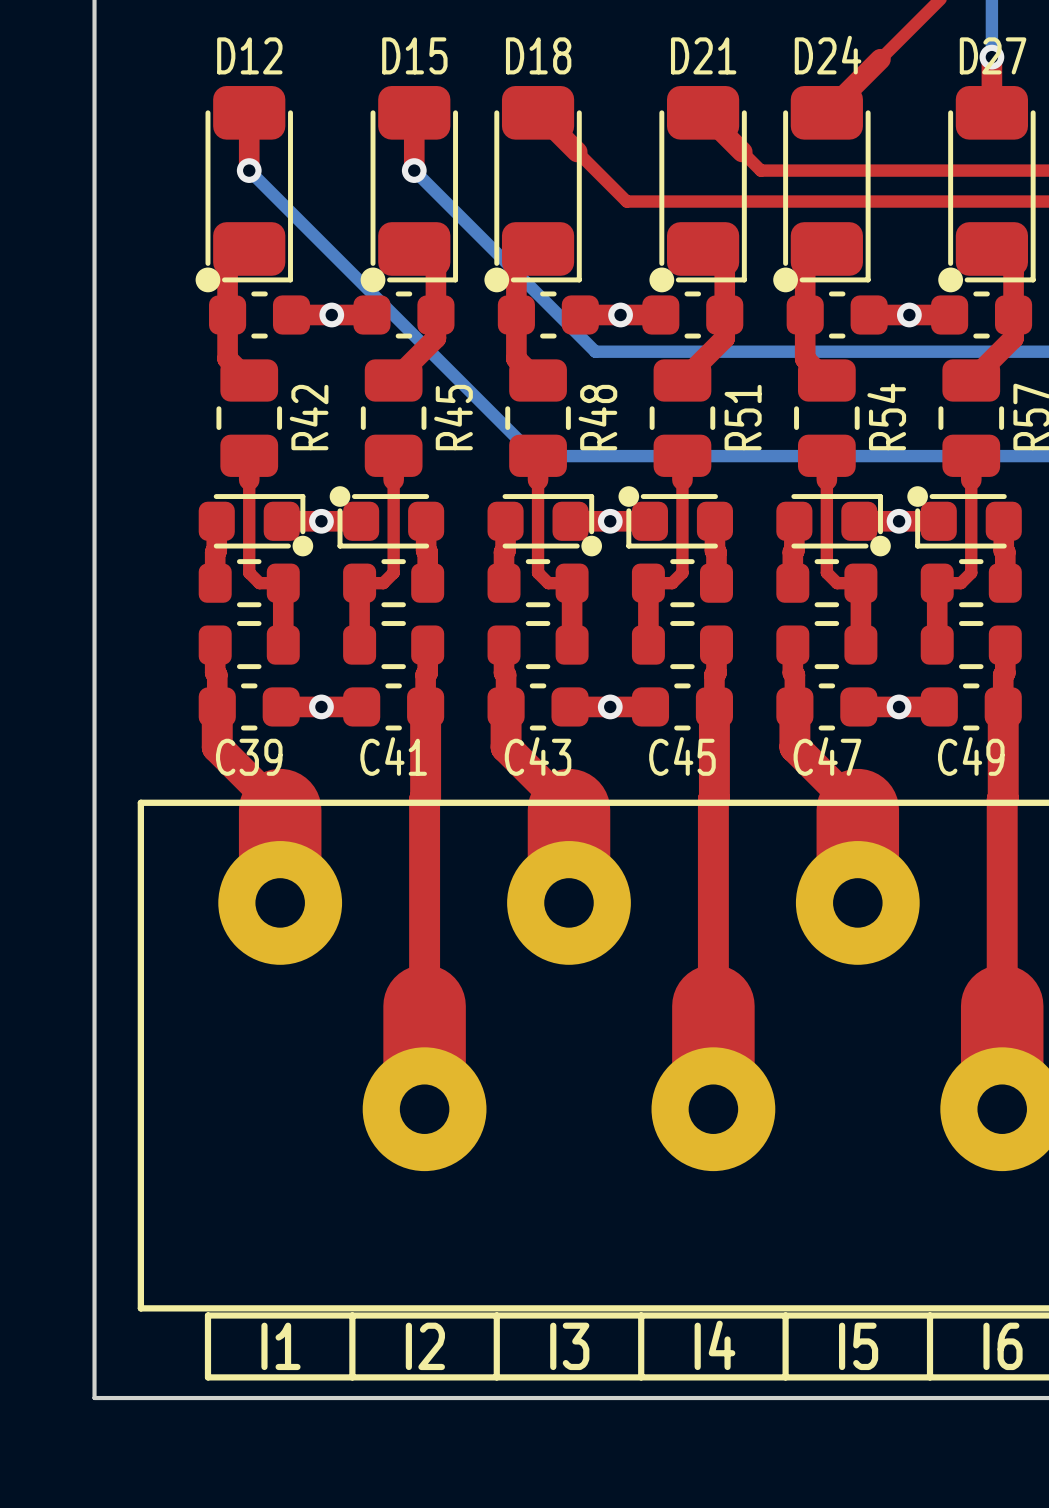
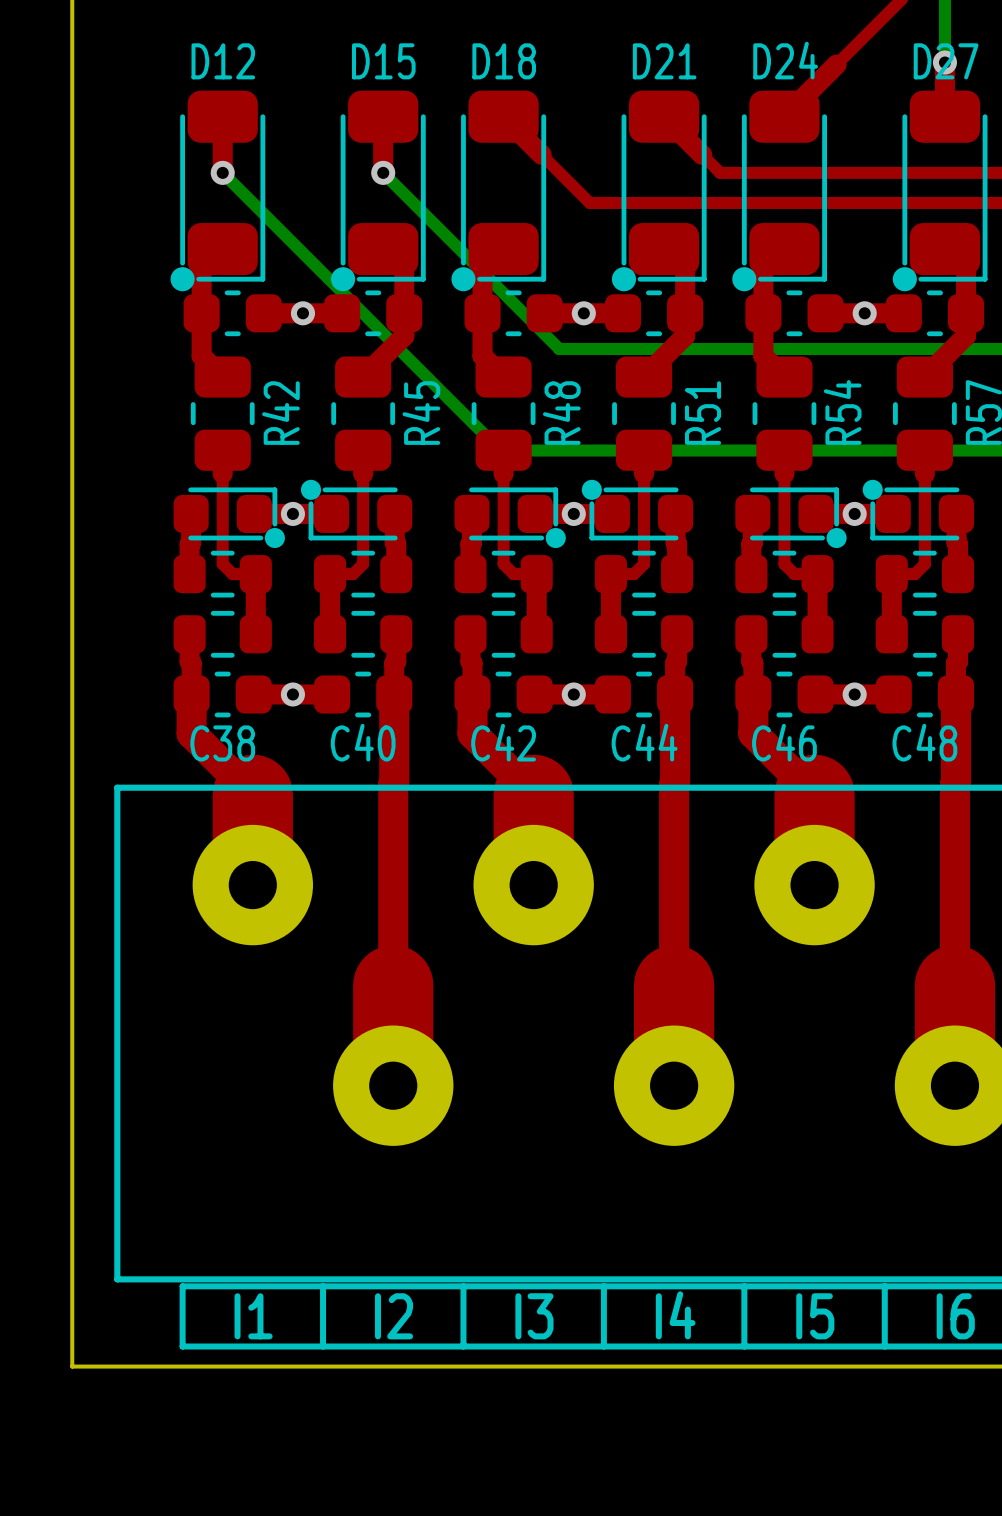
C41 name: C41 (393, 756) -> C40 (363, 742)
C43 name: C43 (538, 756) -> C42 (503, 742)
C45 name: C45 (682, 756) -> C44 (644, 742)
C47 name: C47 (827, 756) -> C46 (784, 742)
C49 name: C49 (971, 756) -> C48 (924, 742)
C39 name: C39 (249, 757) -> C38 (222, 743)

